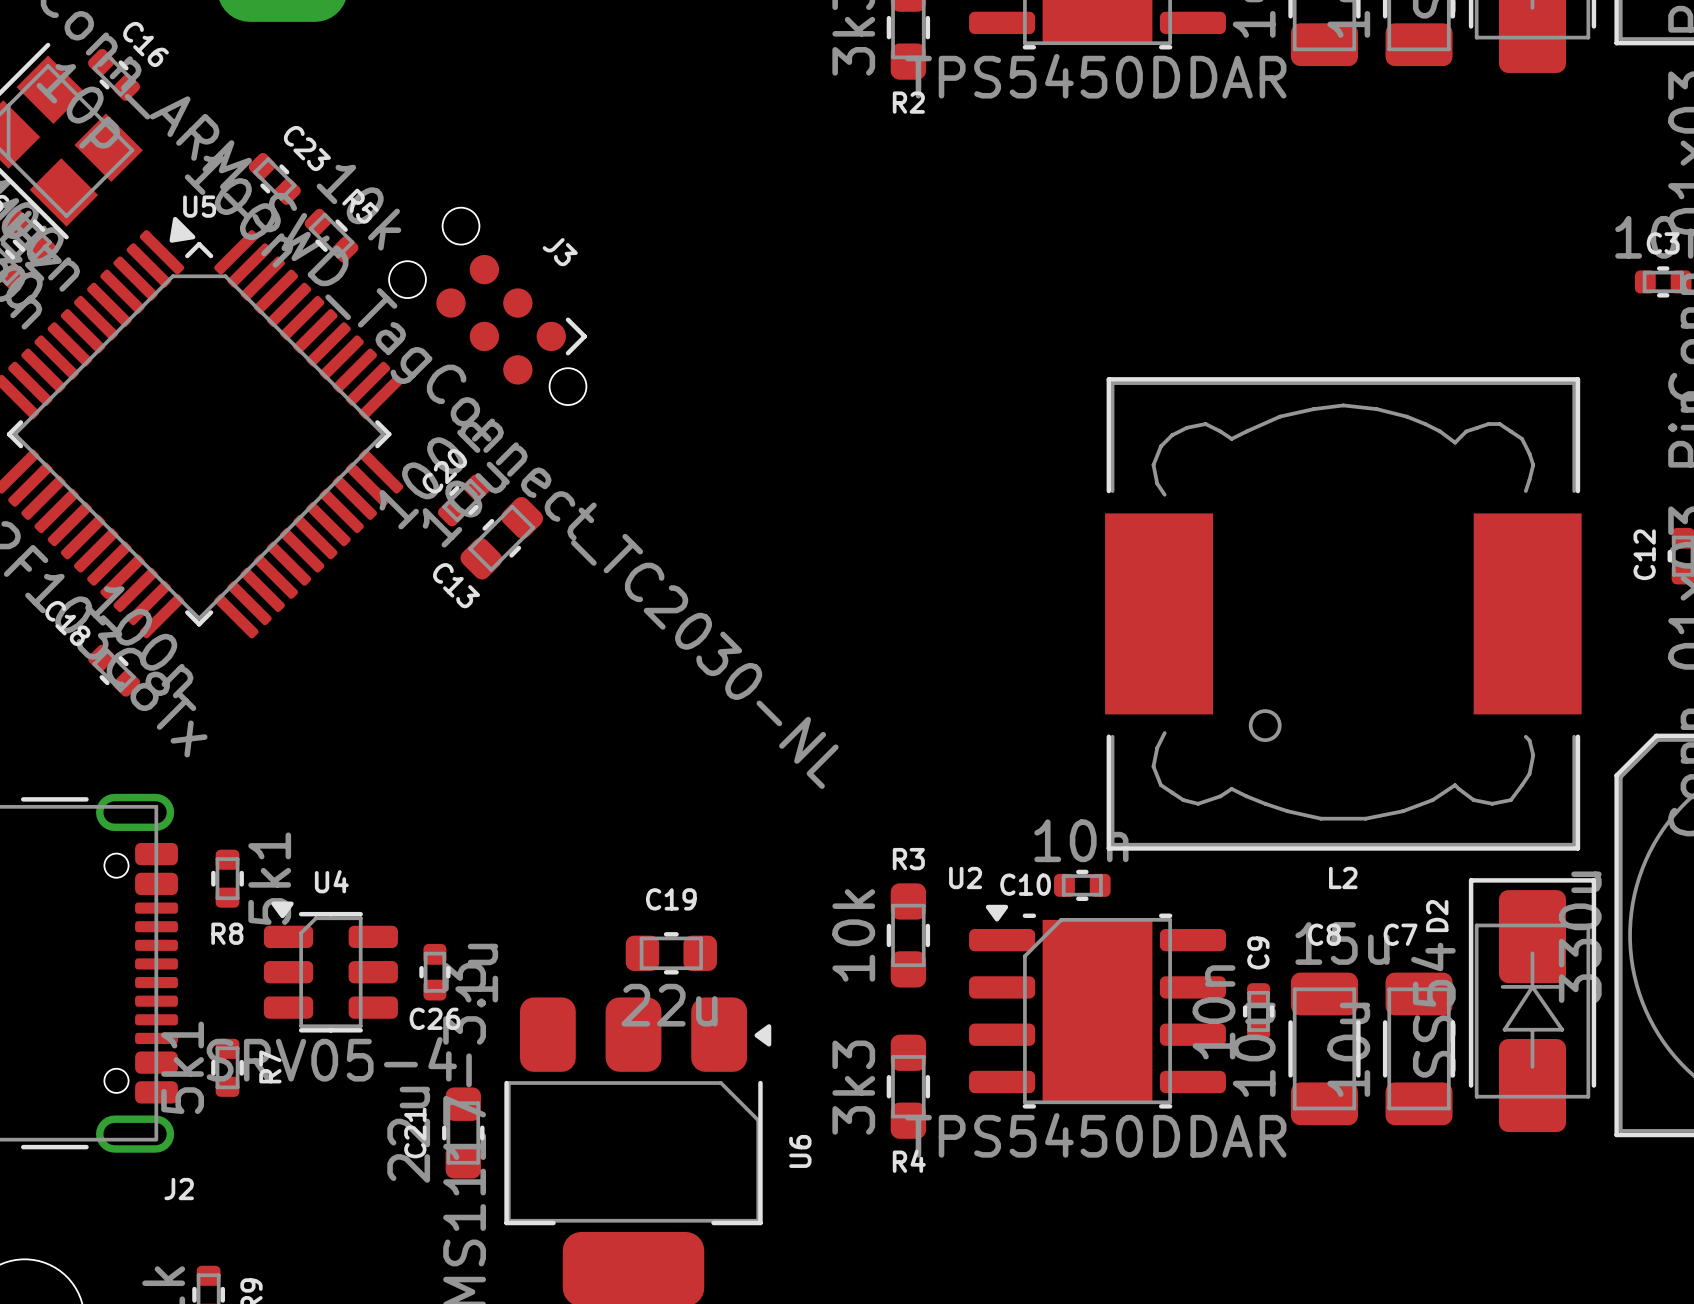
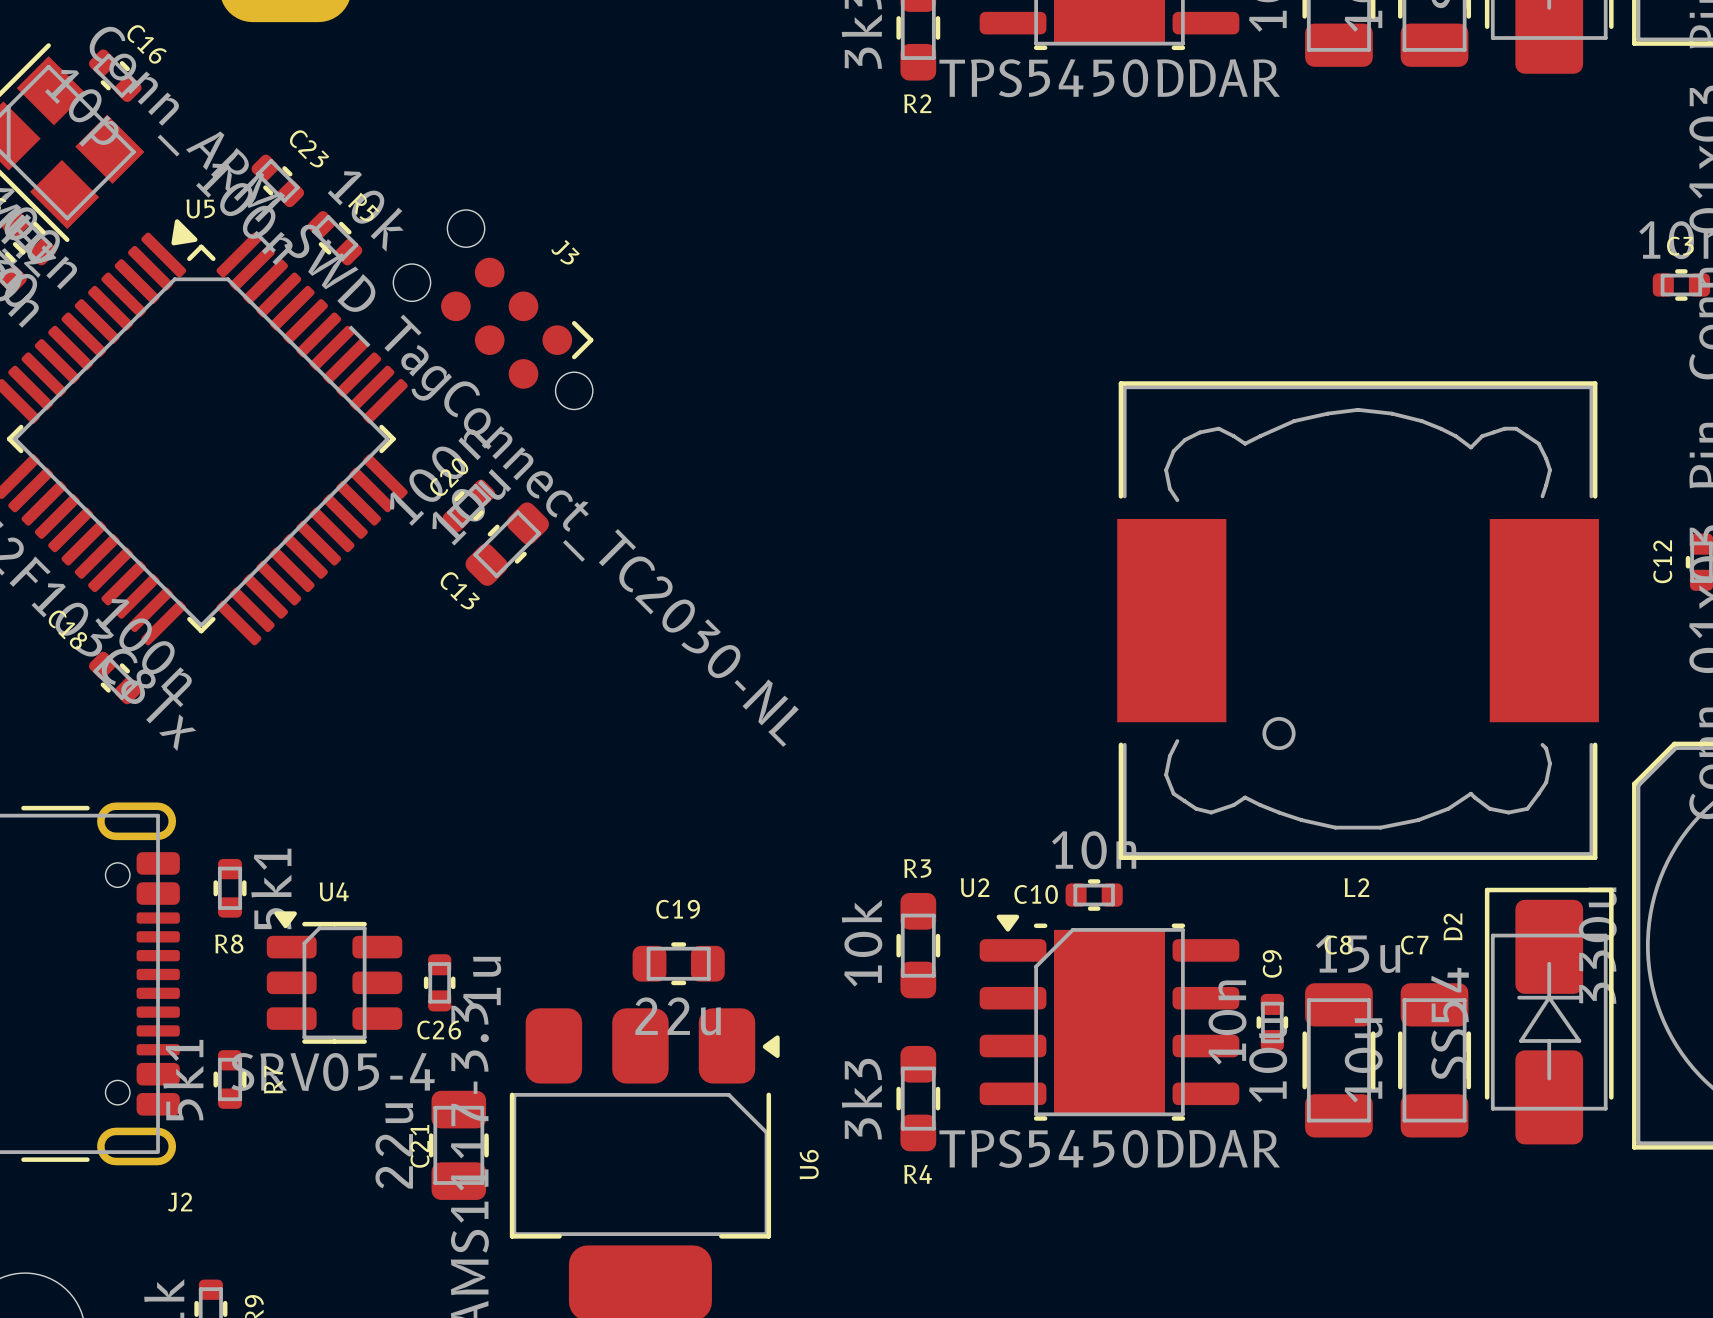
C21 footprint: [442, 1087, 485, 1179] -> [428, 1090, 489, 1200]
C21 value position: 22u (408, 1134) -> 22u (394, 1145)

